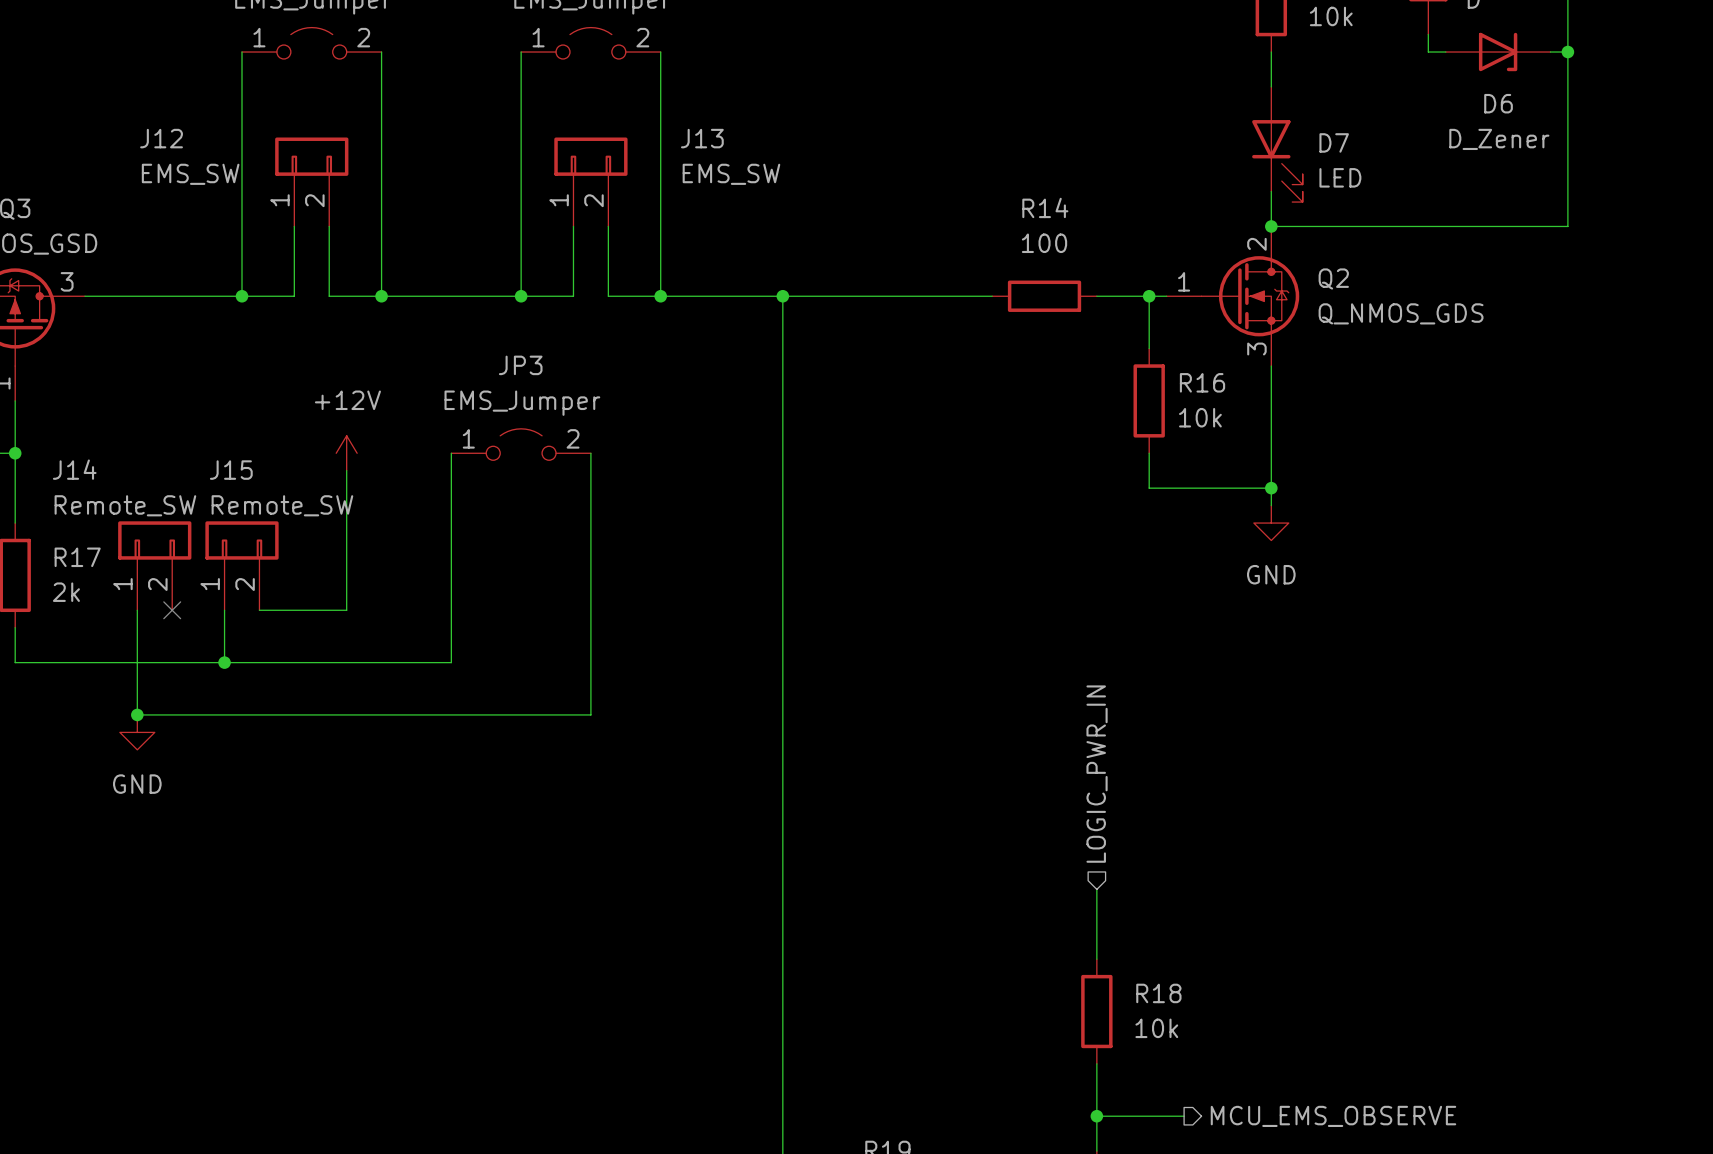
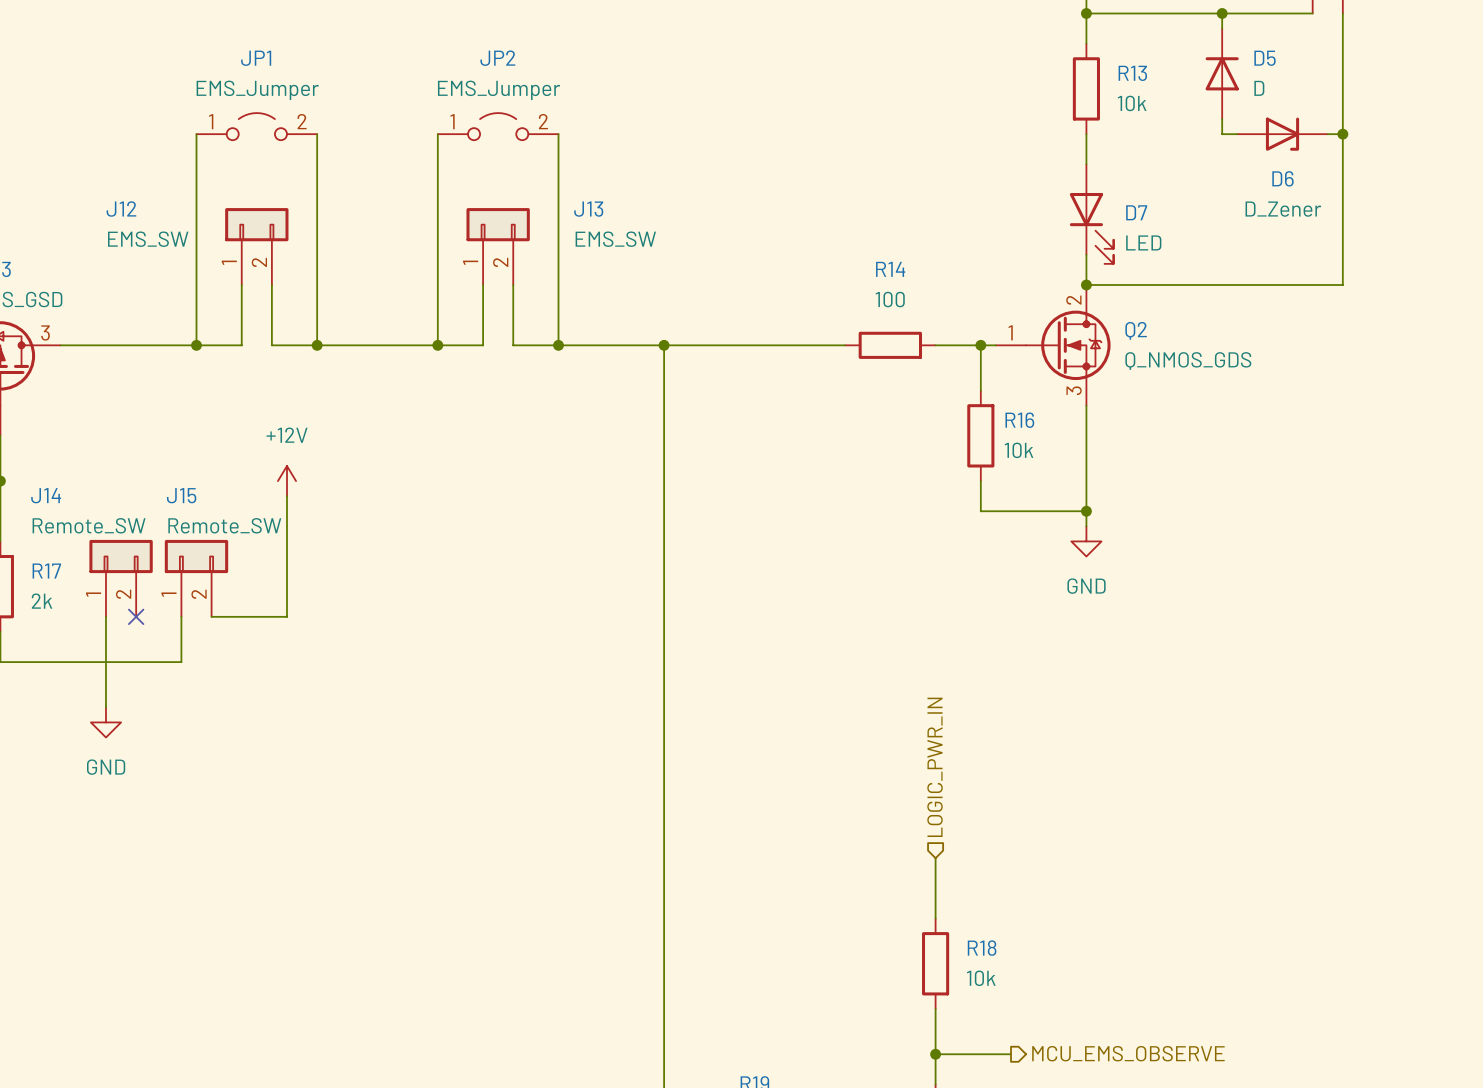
JP3: EMS_Jumper (521, 444) -> none
wire: (451, 453) (451, 662) (224, 662) -> none
wire: (590, 453) (590, 714) (137, 714) -> none
junction: (224, 662) -> none
junction: (137, 714) -> none

